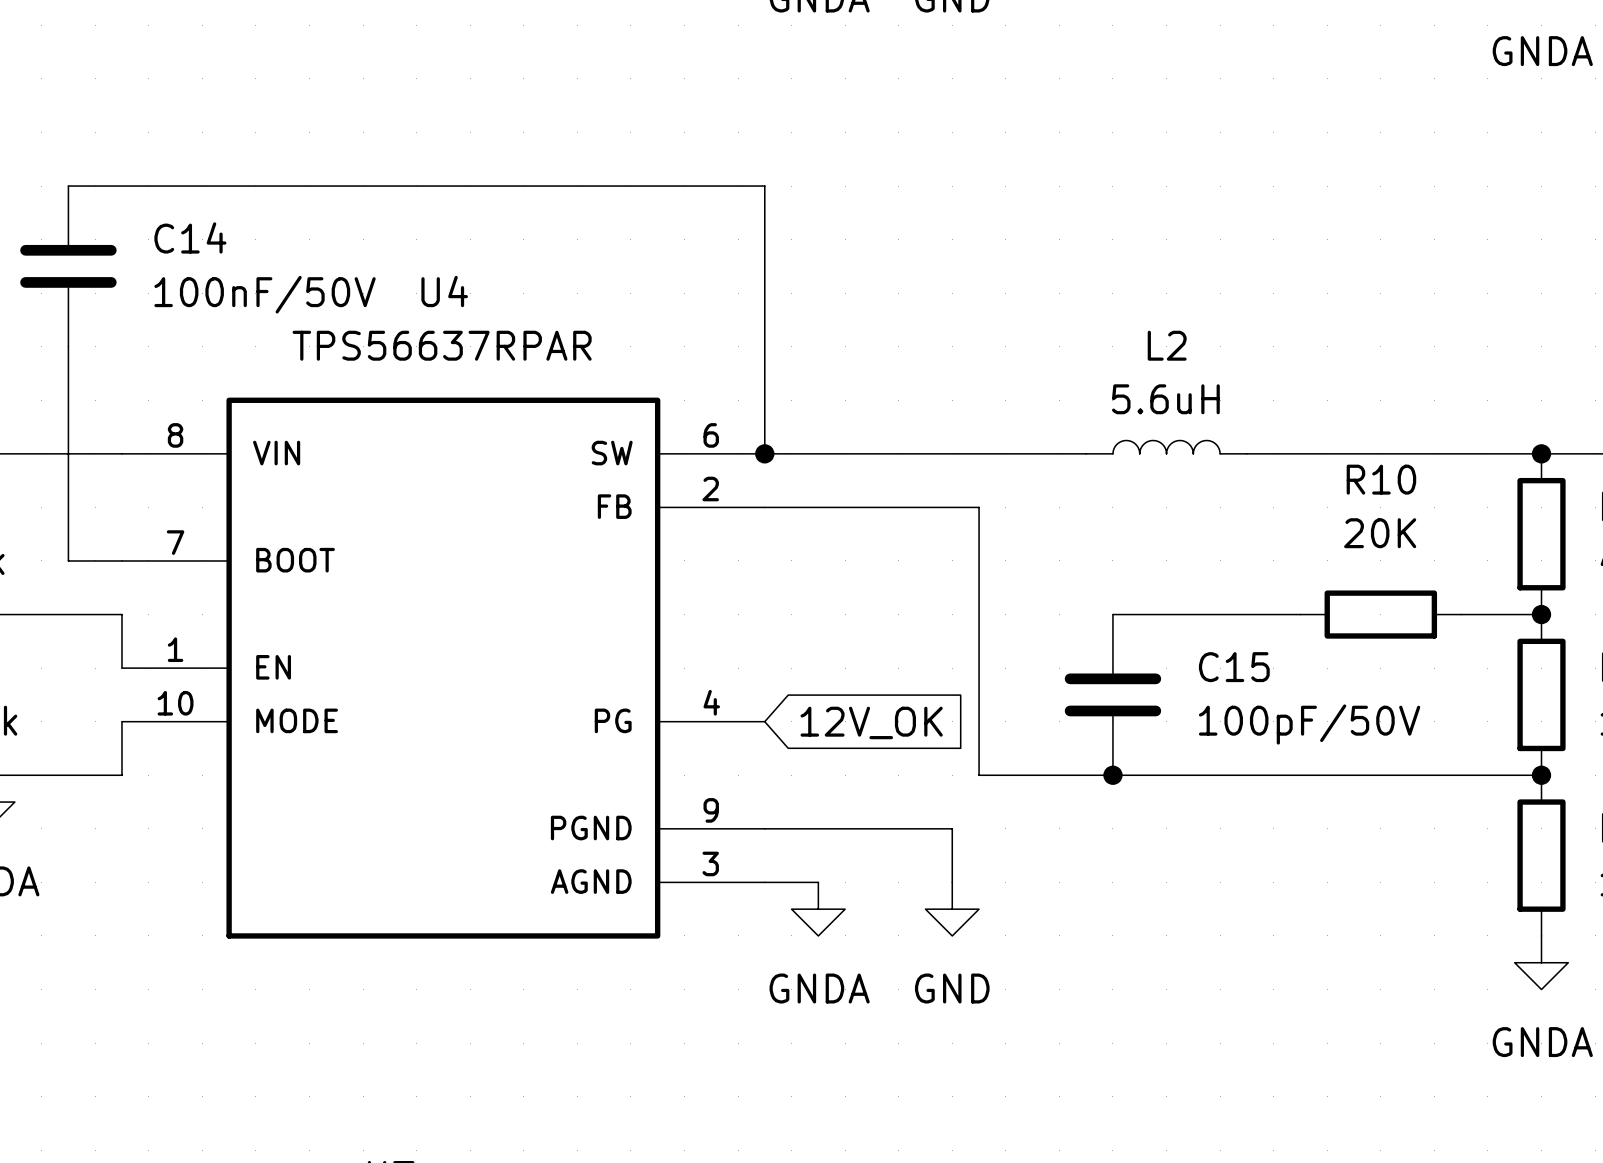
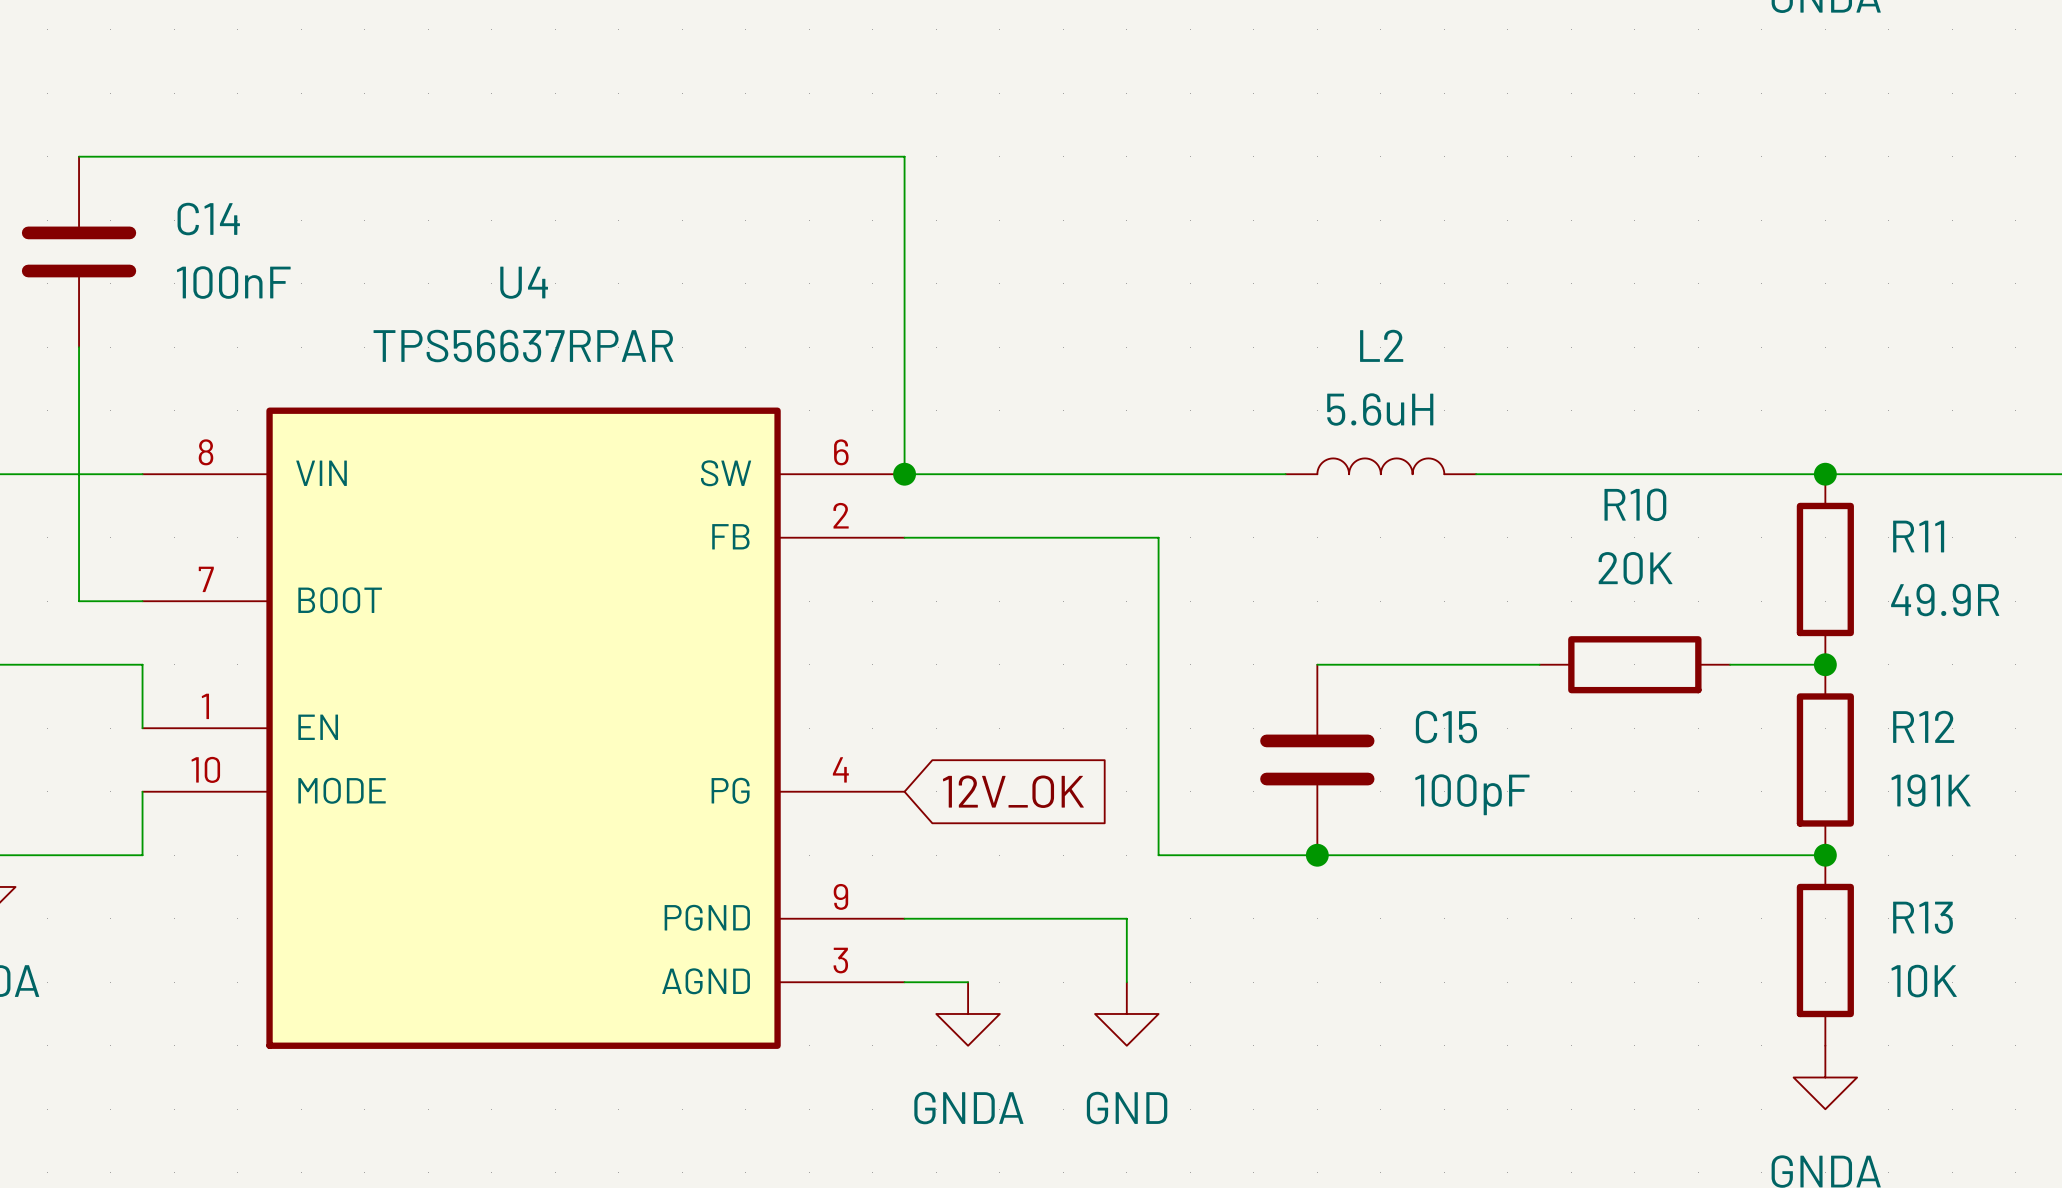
C14 value: 100nF/50V (265, 294) -> 100nF (233, 282)
C15 value: 100pF/50V (1309, 724) -> 100pF (1472, 794)

